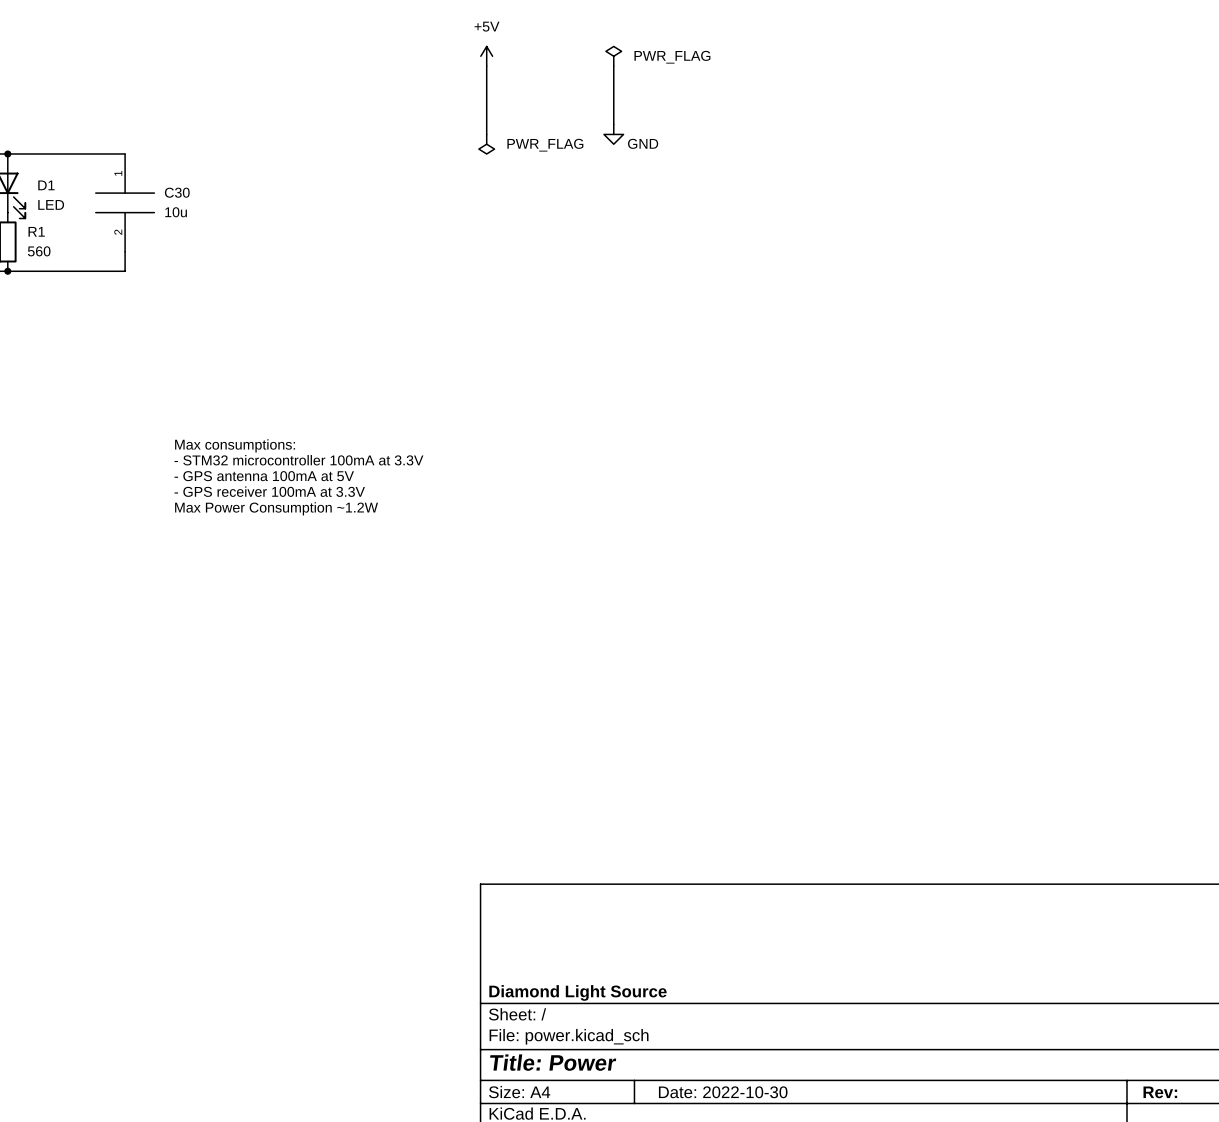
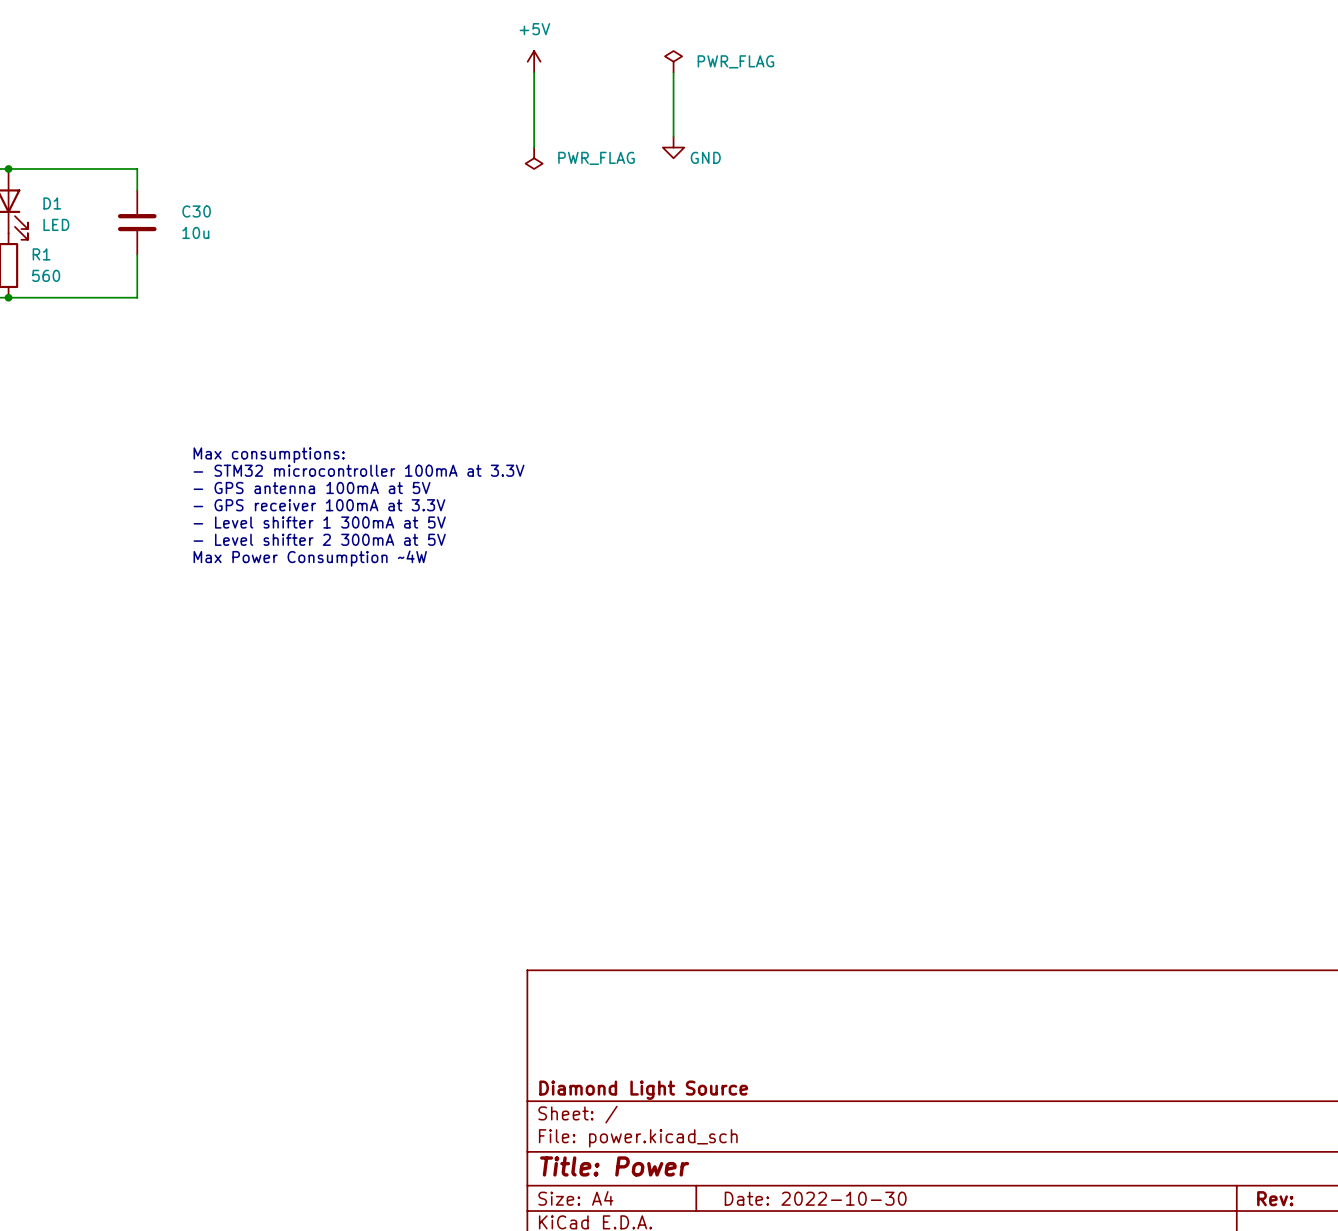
C30 symbol: [95, 153, 155, 252] -> [117, 190, 157, 255]
text: none -> Max consumptions: (269, 455)
text: none -> - STM32 microcontroller 100mA at 3.3V (359, 470)
text: Max consumptions: (235, 445) -> - GPS antenna 100mA at 5V (312, 487)
text: - STM32 microcontroller 100mA at 3.3V (298, 460) -> - GPS receiver 100mA at 3.3V (319, 505)
text: - GPS antenna 100mA at 5V (264, 476) -> - Level shifter 1 300mA at 5V (319, 522)
text: - GPS receiver 100mA at 3.3V (269, 491) -> - Level shifter 2 300mA at 5V (319, 539)
text: Max Power Consumption ~1.2W (276, 508) -> Max Power Consumption ~4W (310, 558)

